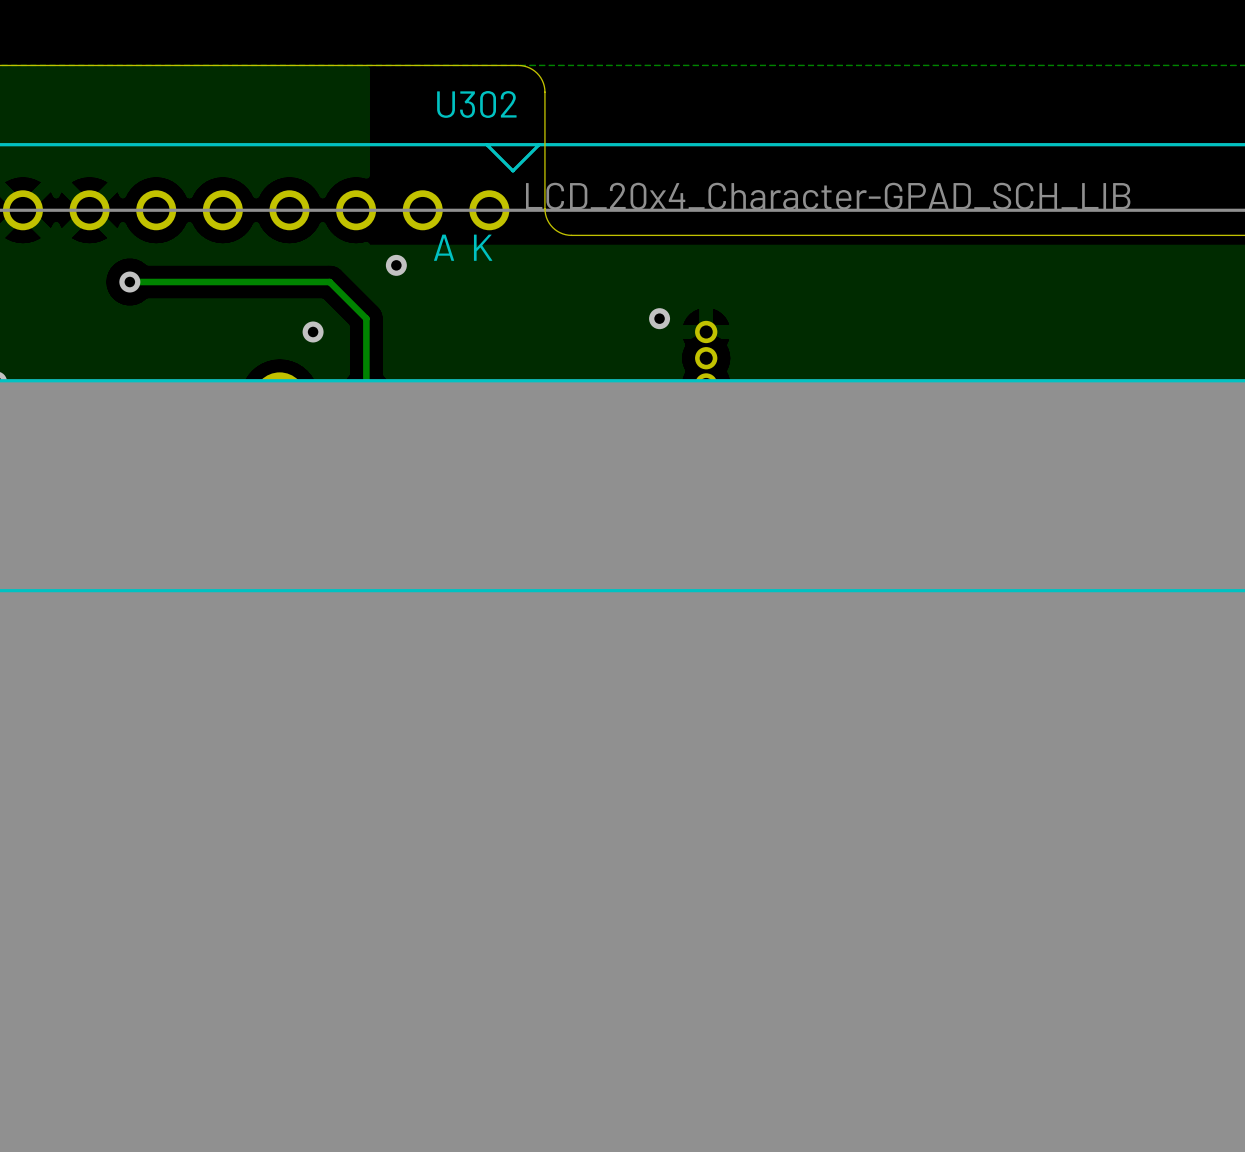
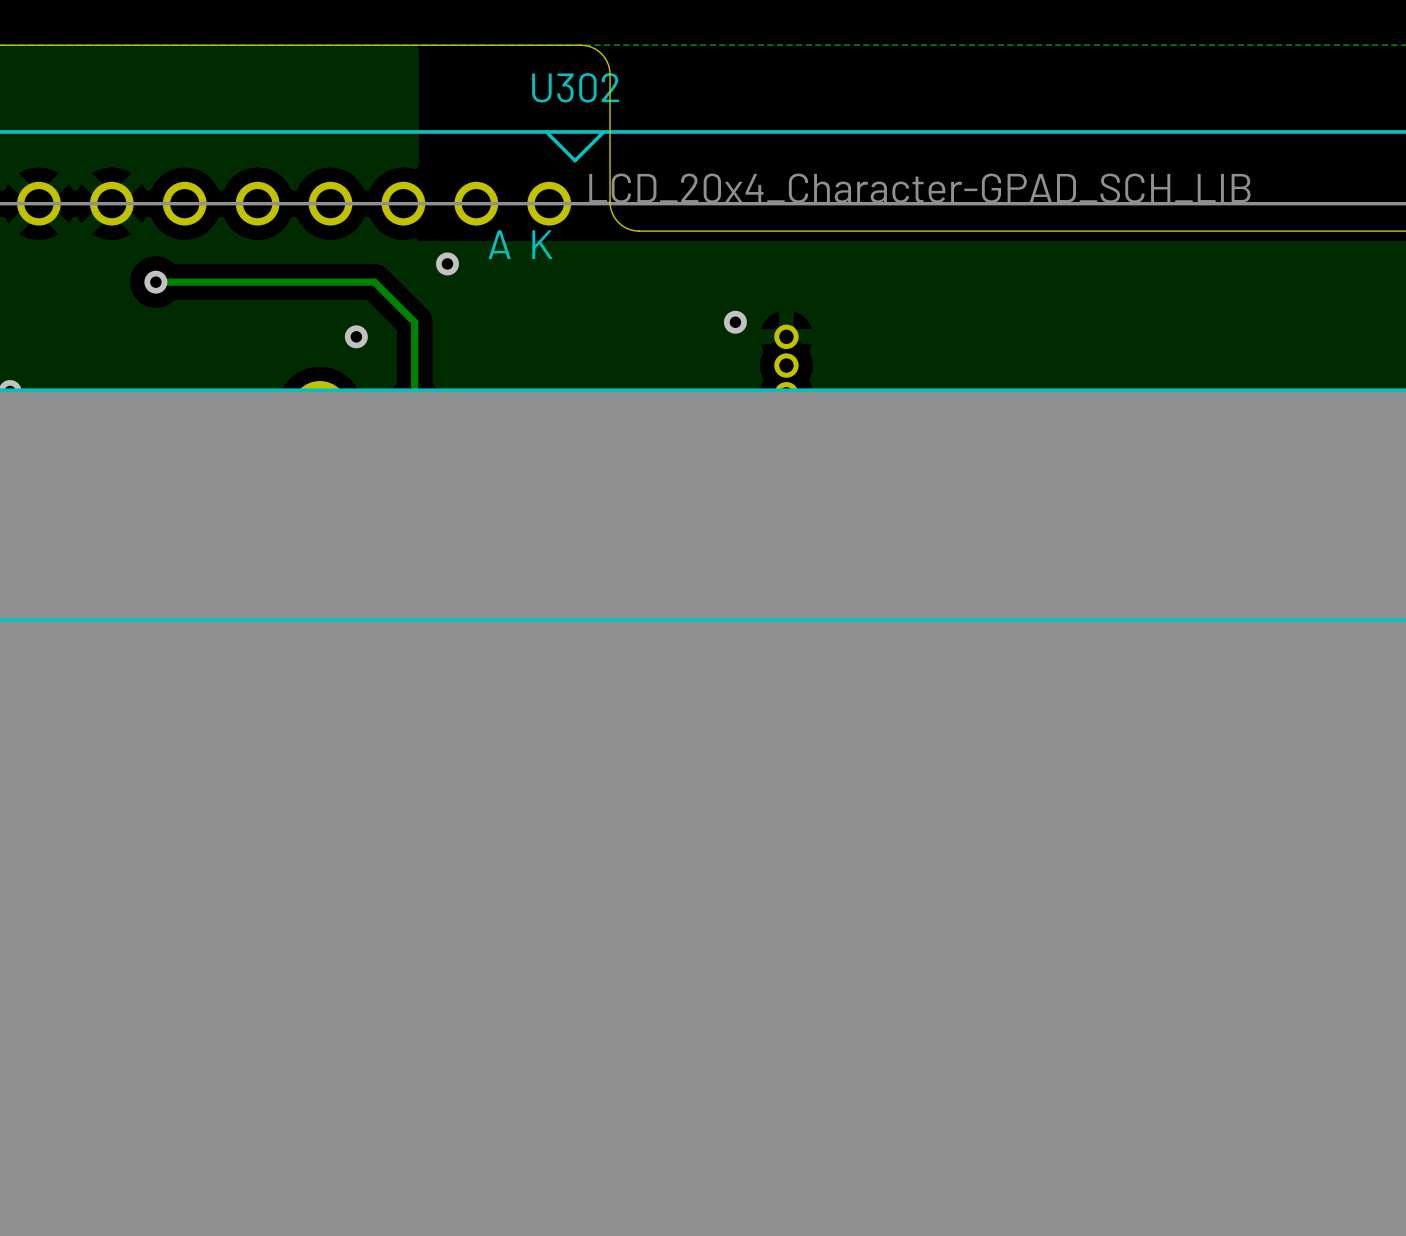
U302 name position: U302 (476, 104) -> U302 (575, 87)

